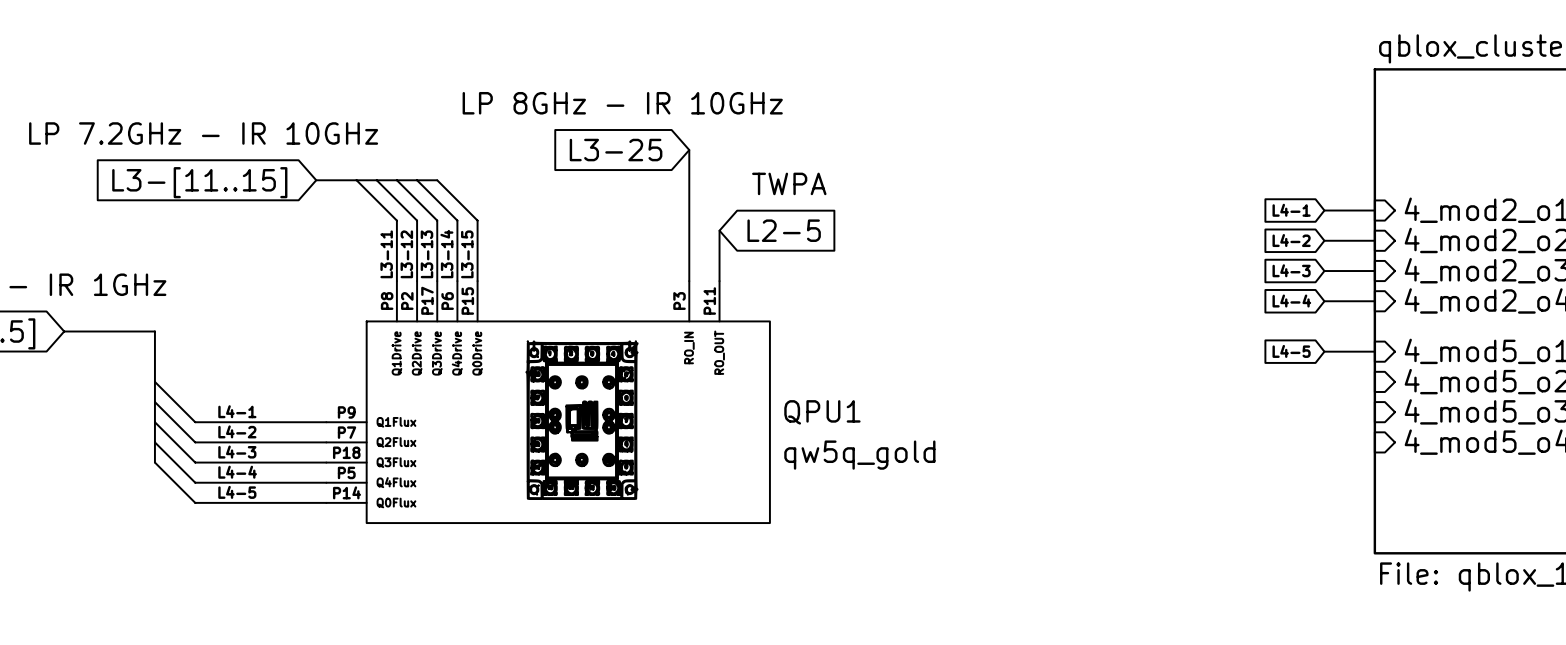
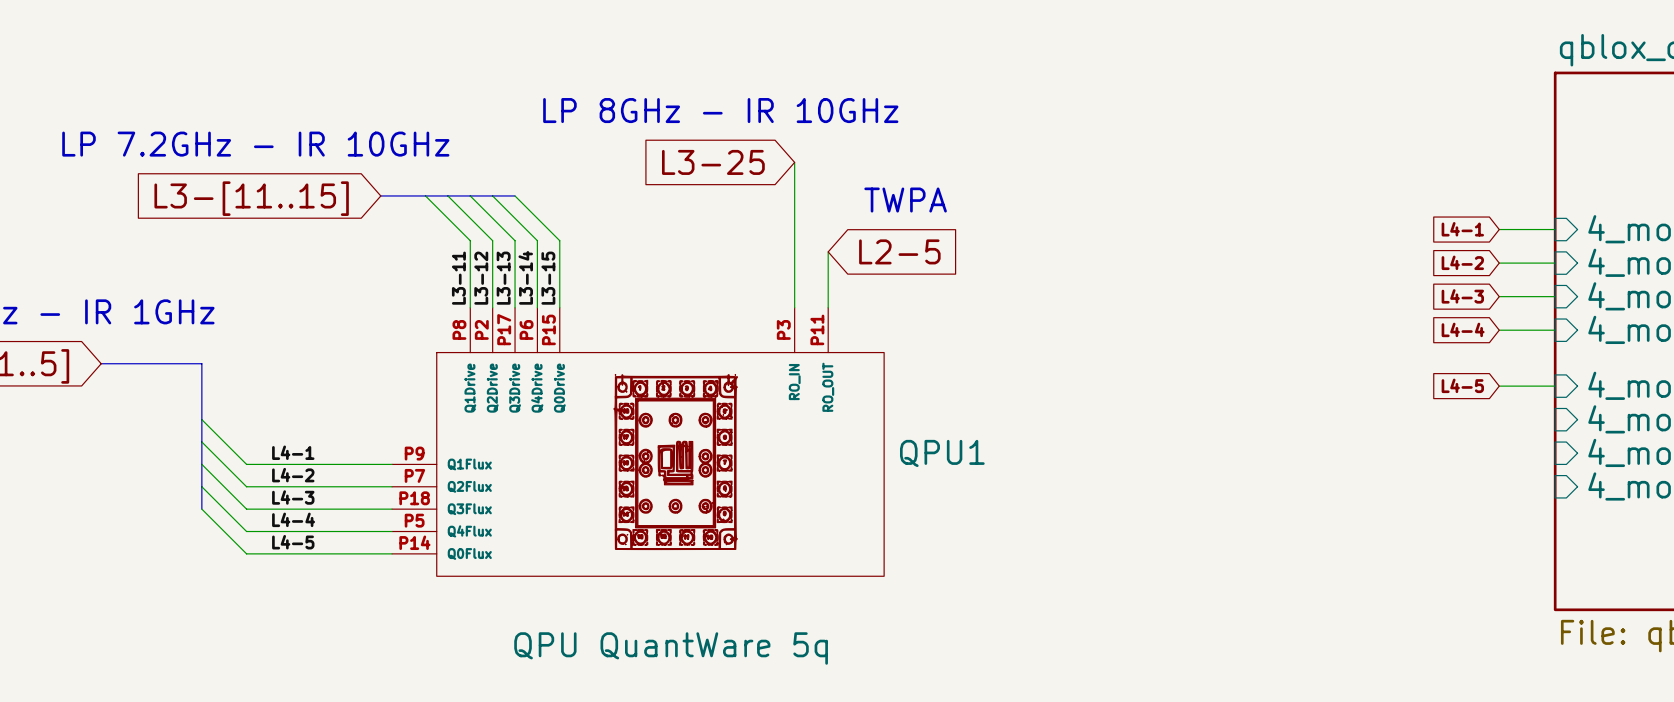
QPU1 value: qw5q_gold (859, 455) -> QPU QuantWare 5q (671, 648)

